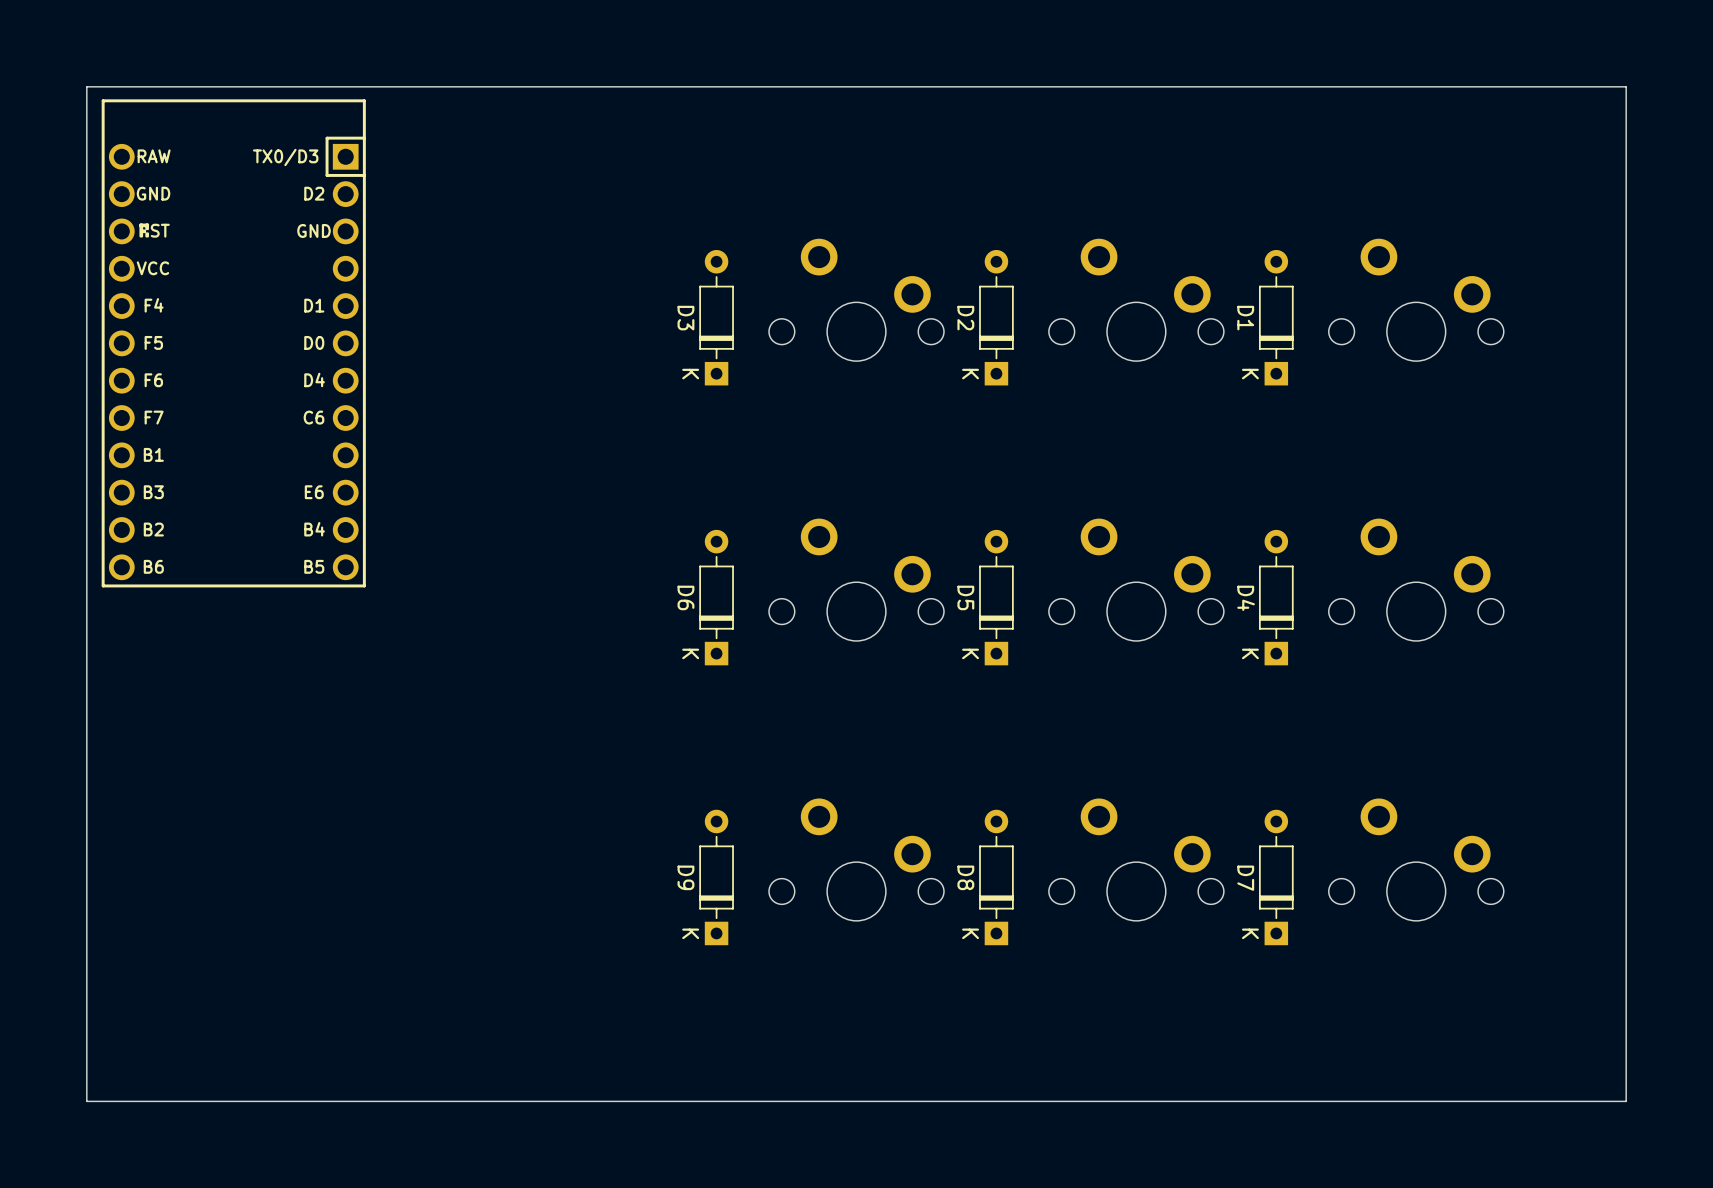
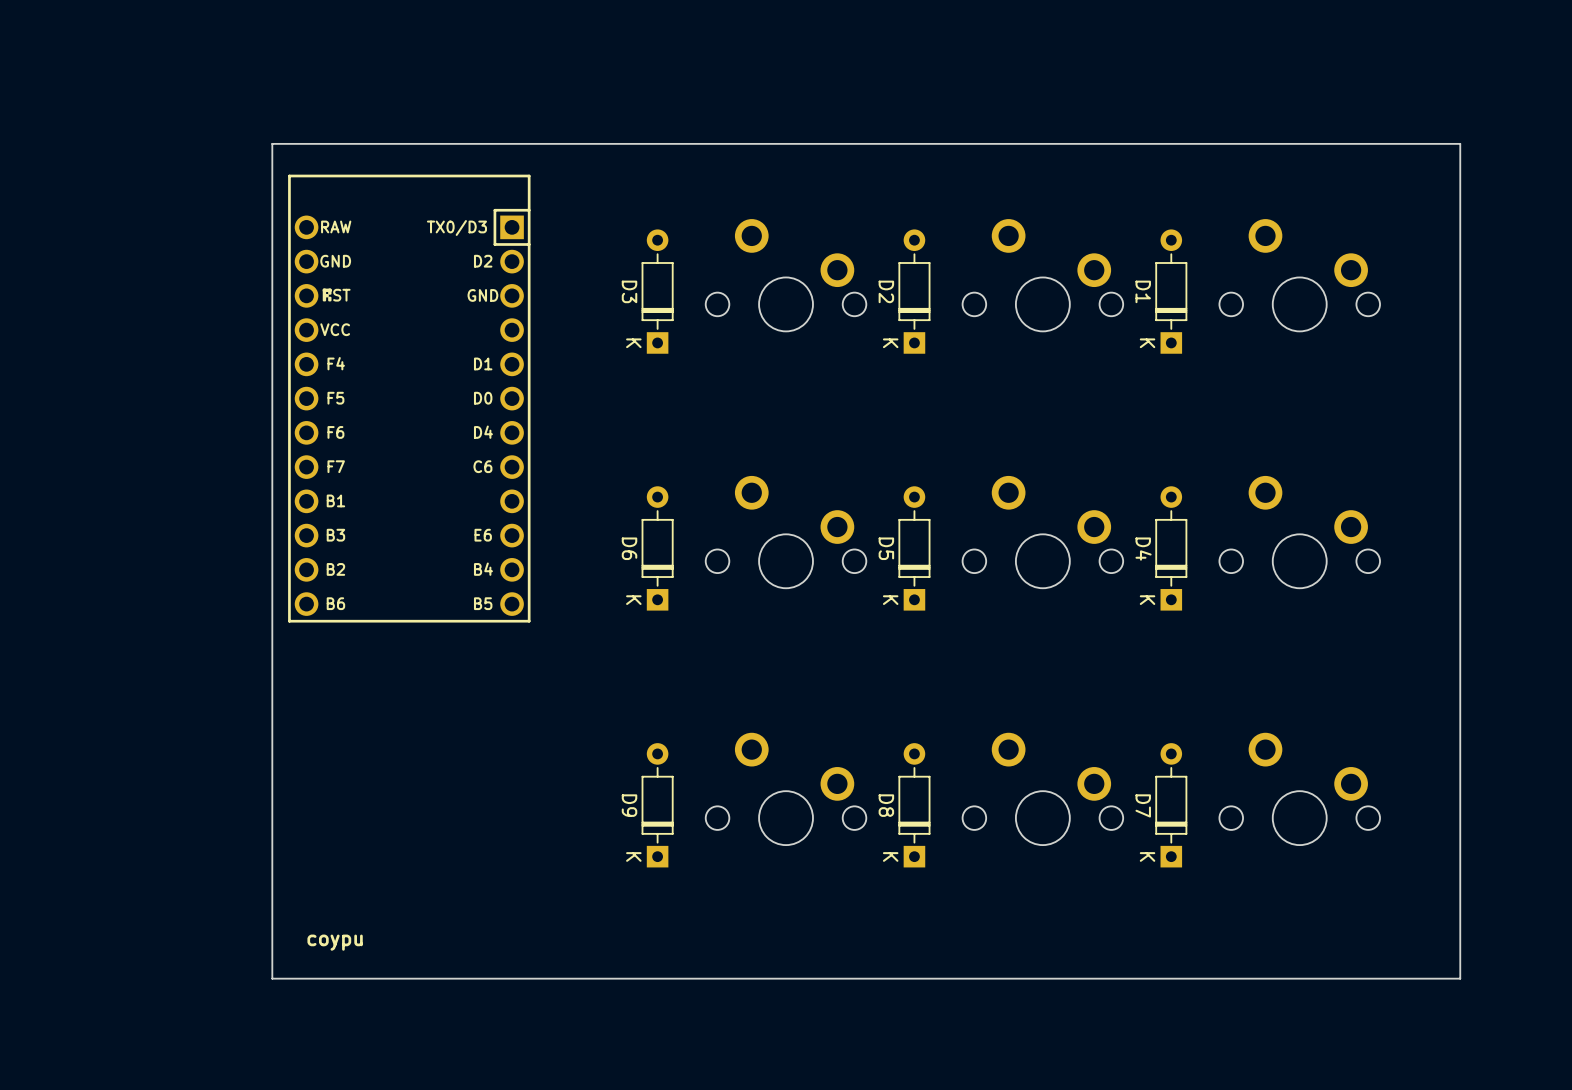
board edge: (1626, 86) (86, 86) (86, 1101) (1626, 1101) (1626, 86) -> (1460, 143) (1460, 978) (272, 978) (272, 143) (1460, 143)
part position: (233, 343) -> (409, 398)
text: none -> coypu (335, 942)

